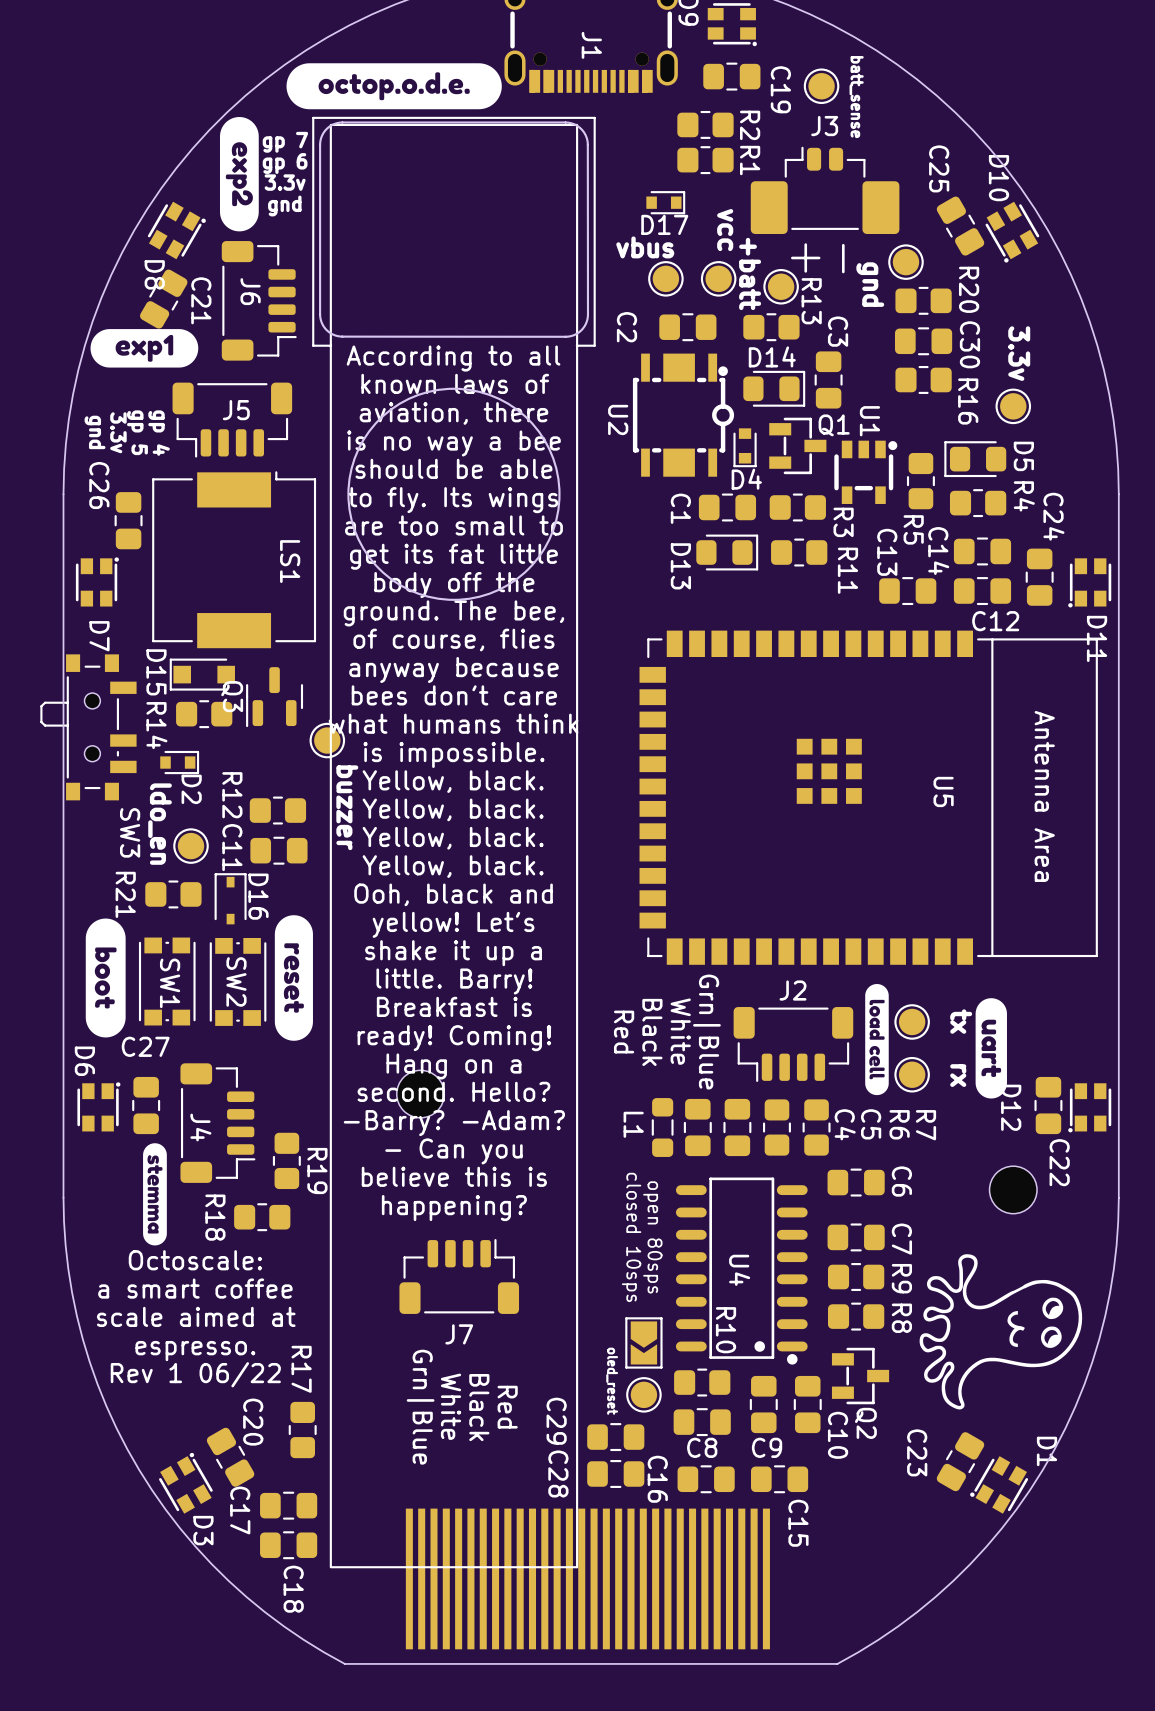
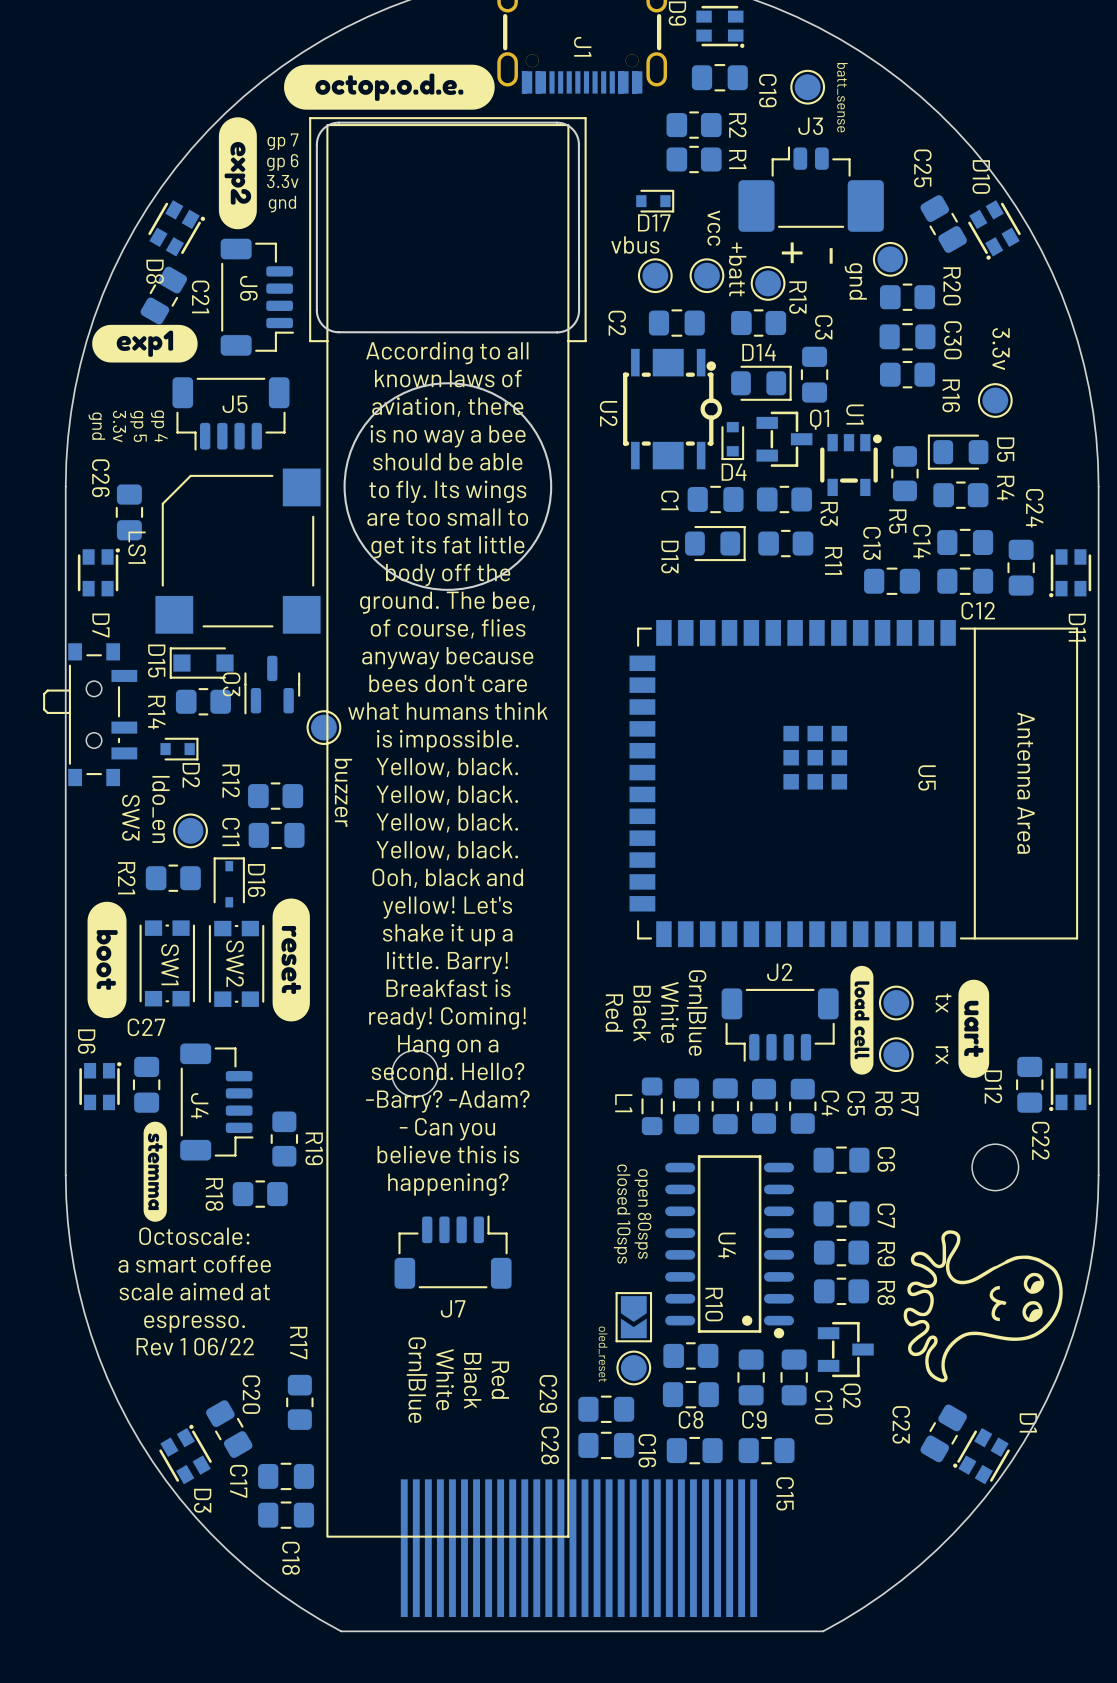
LS1 footprint: [152, 471, 317, 649] -> [155, 468, 321, 634]
LS1 name position: LS1 (290, 561) -> LS1 (137, 547)

